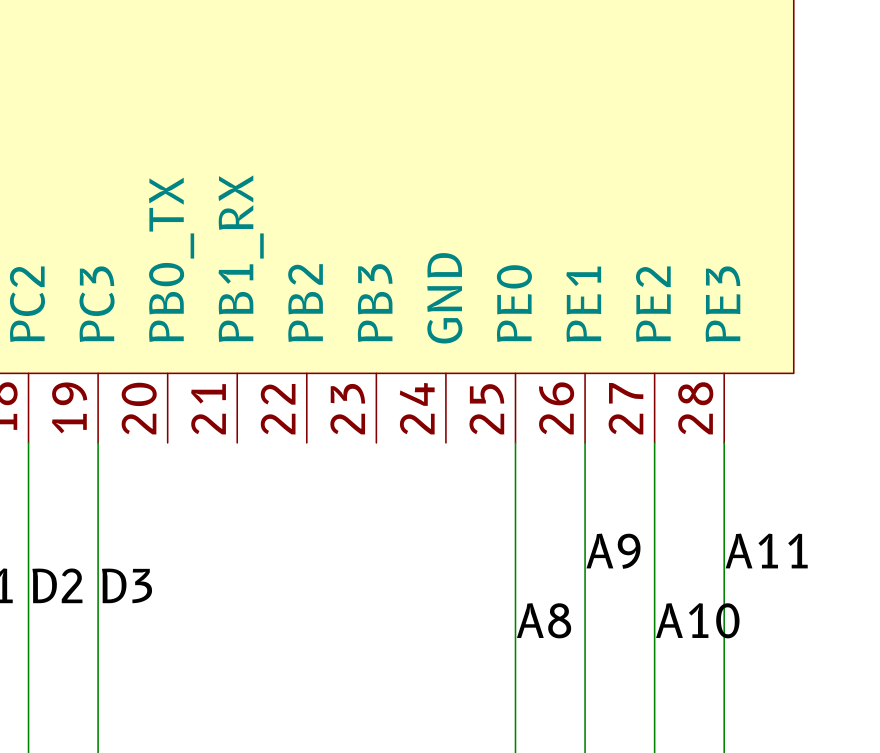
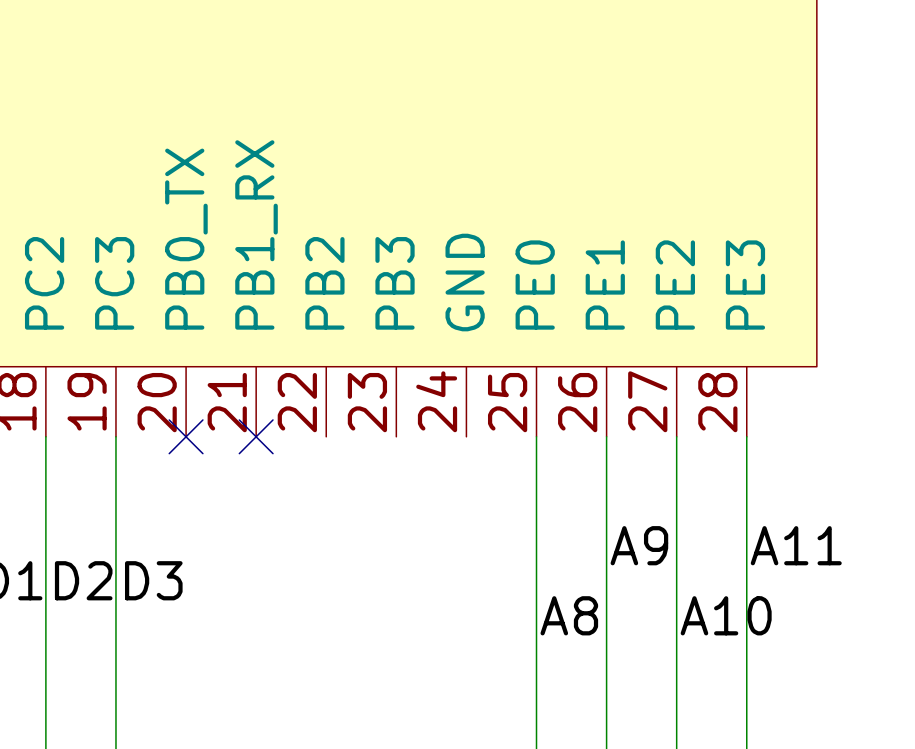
no-connect mark: none -> (186, 436)
no-connect mark: none -> (256, 436)

